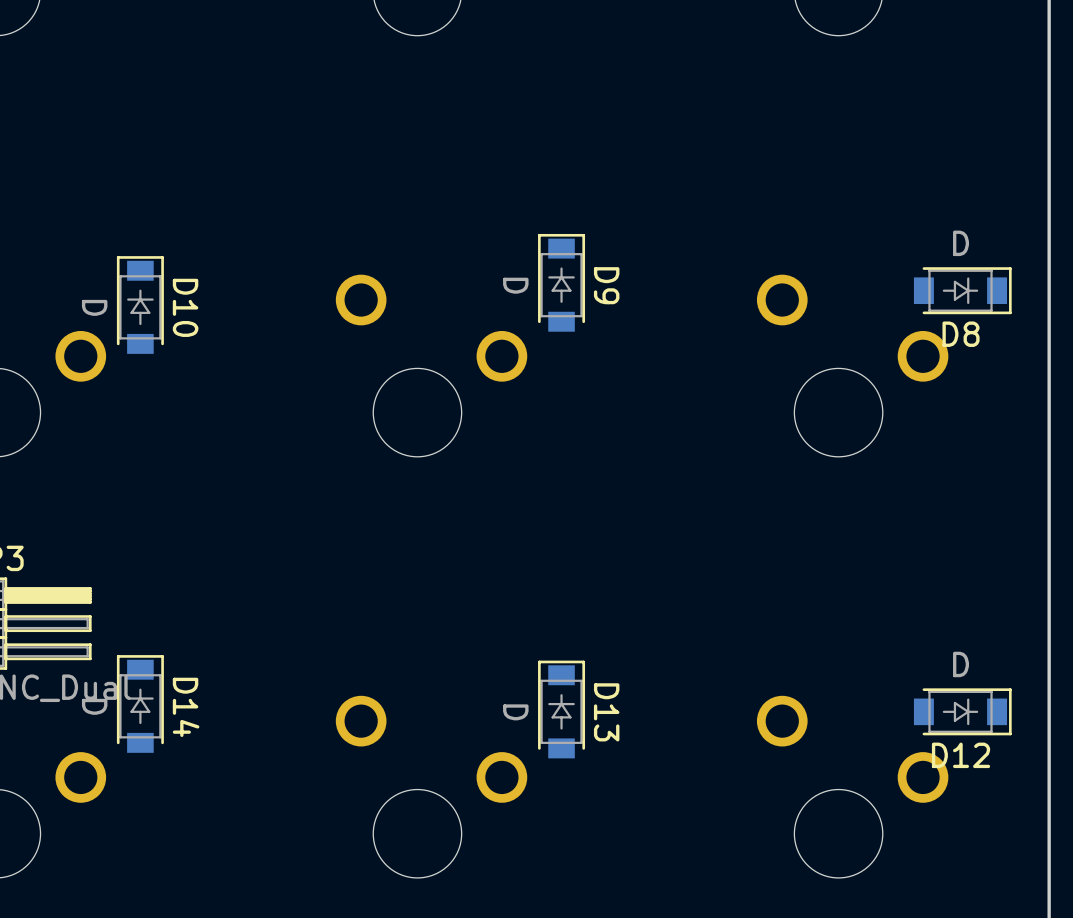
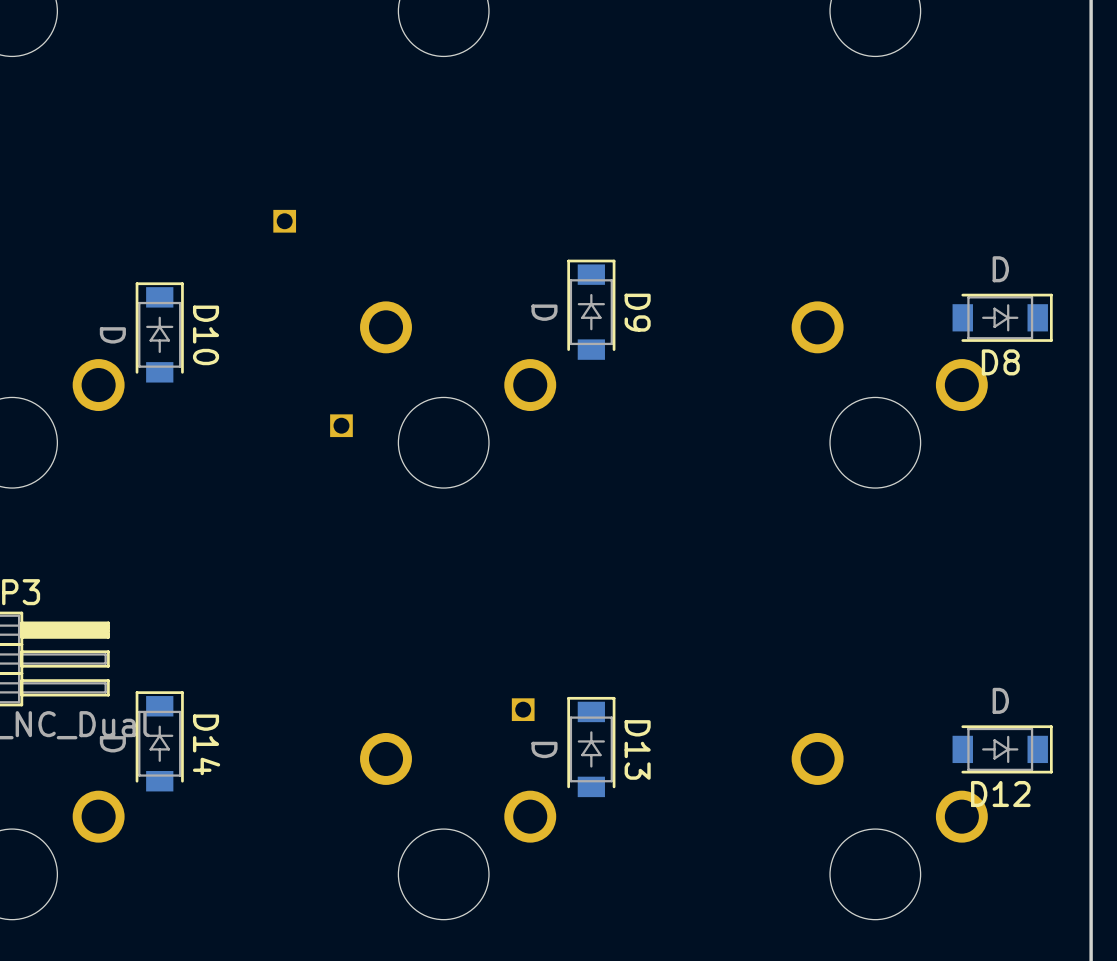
part: none -> (284, 221)
part: none -> (341, 425)
part: none -> (523, 709)

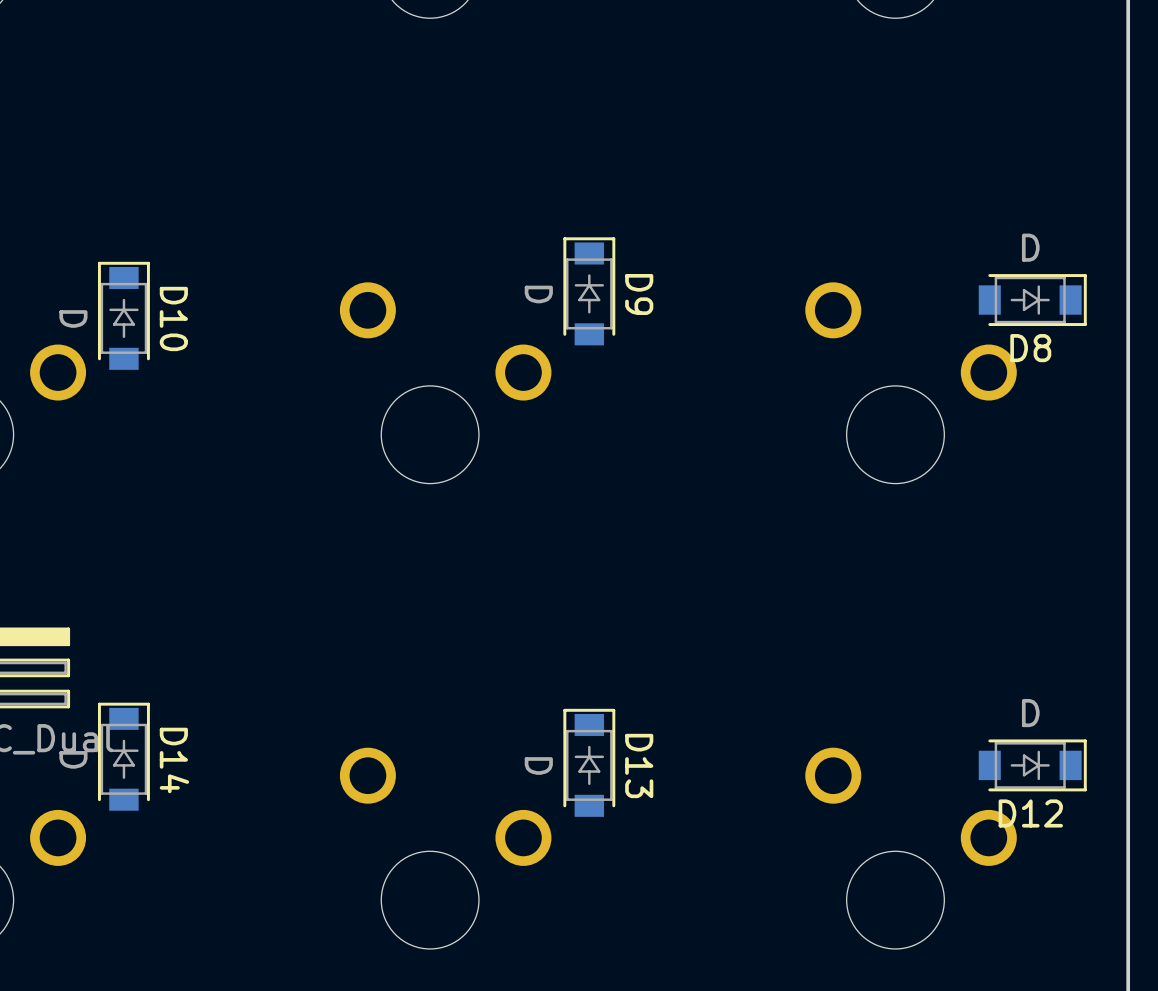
part: (284, 221) -> none
part: (341, 425) -> none
part: (523, 709) -> none

